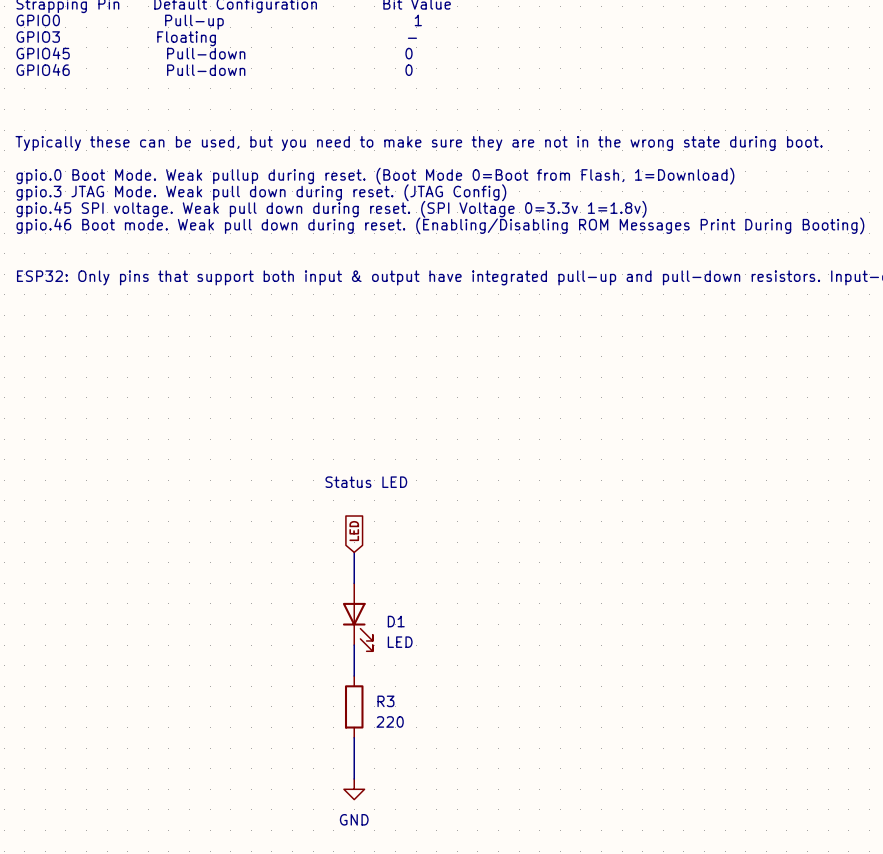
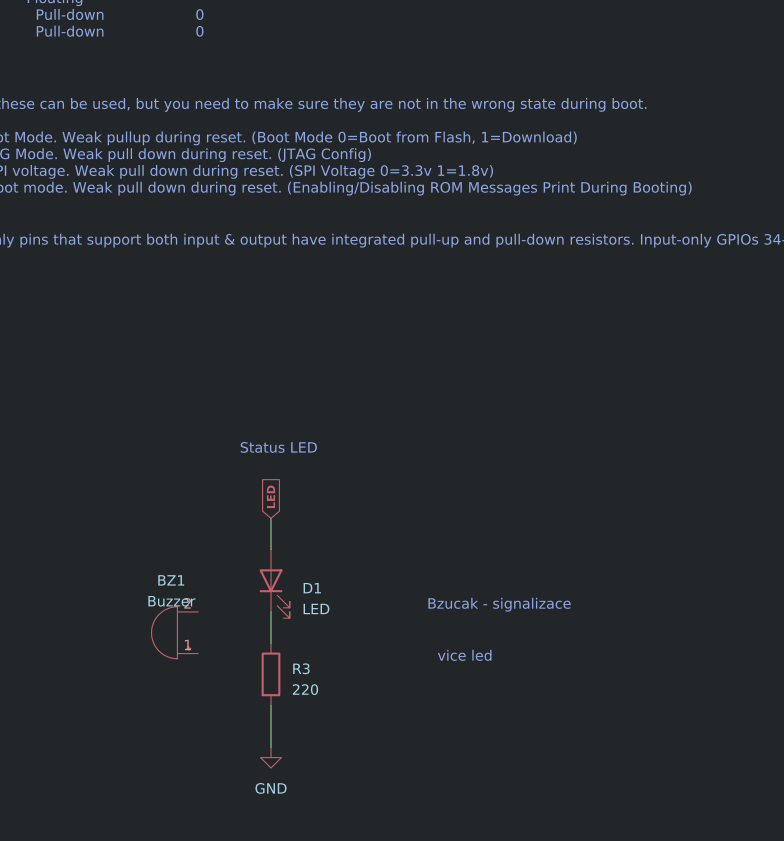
text: none -> Bzucak - signalizace (499, 604)
BZ1: none -> Buzzer (174, 632)
text: none -> vice led (464, 655)

